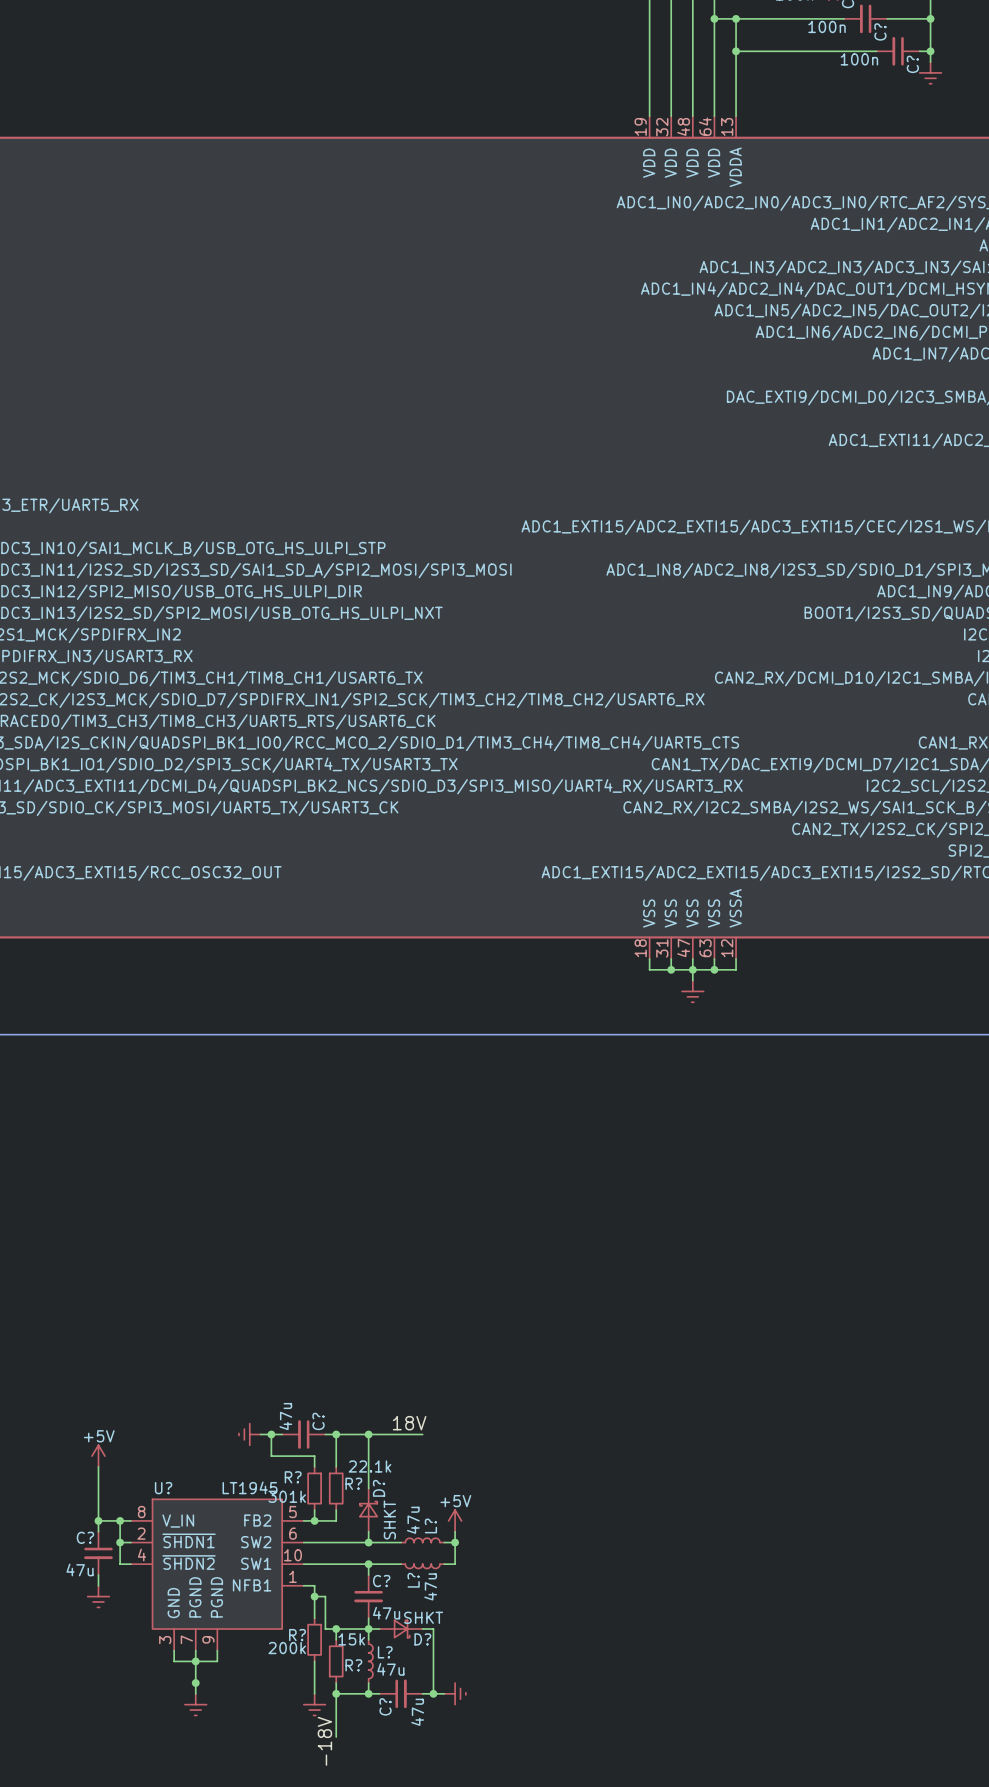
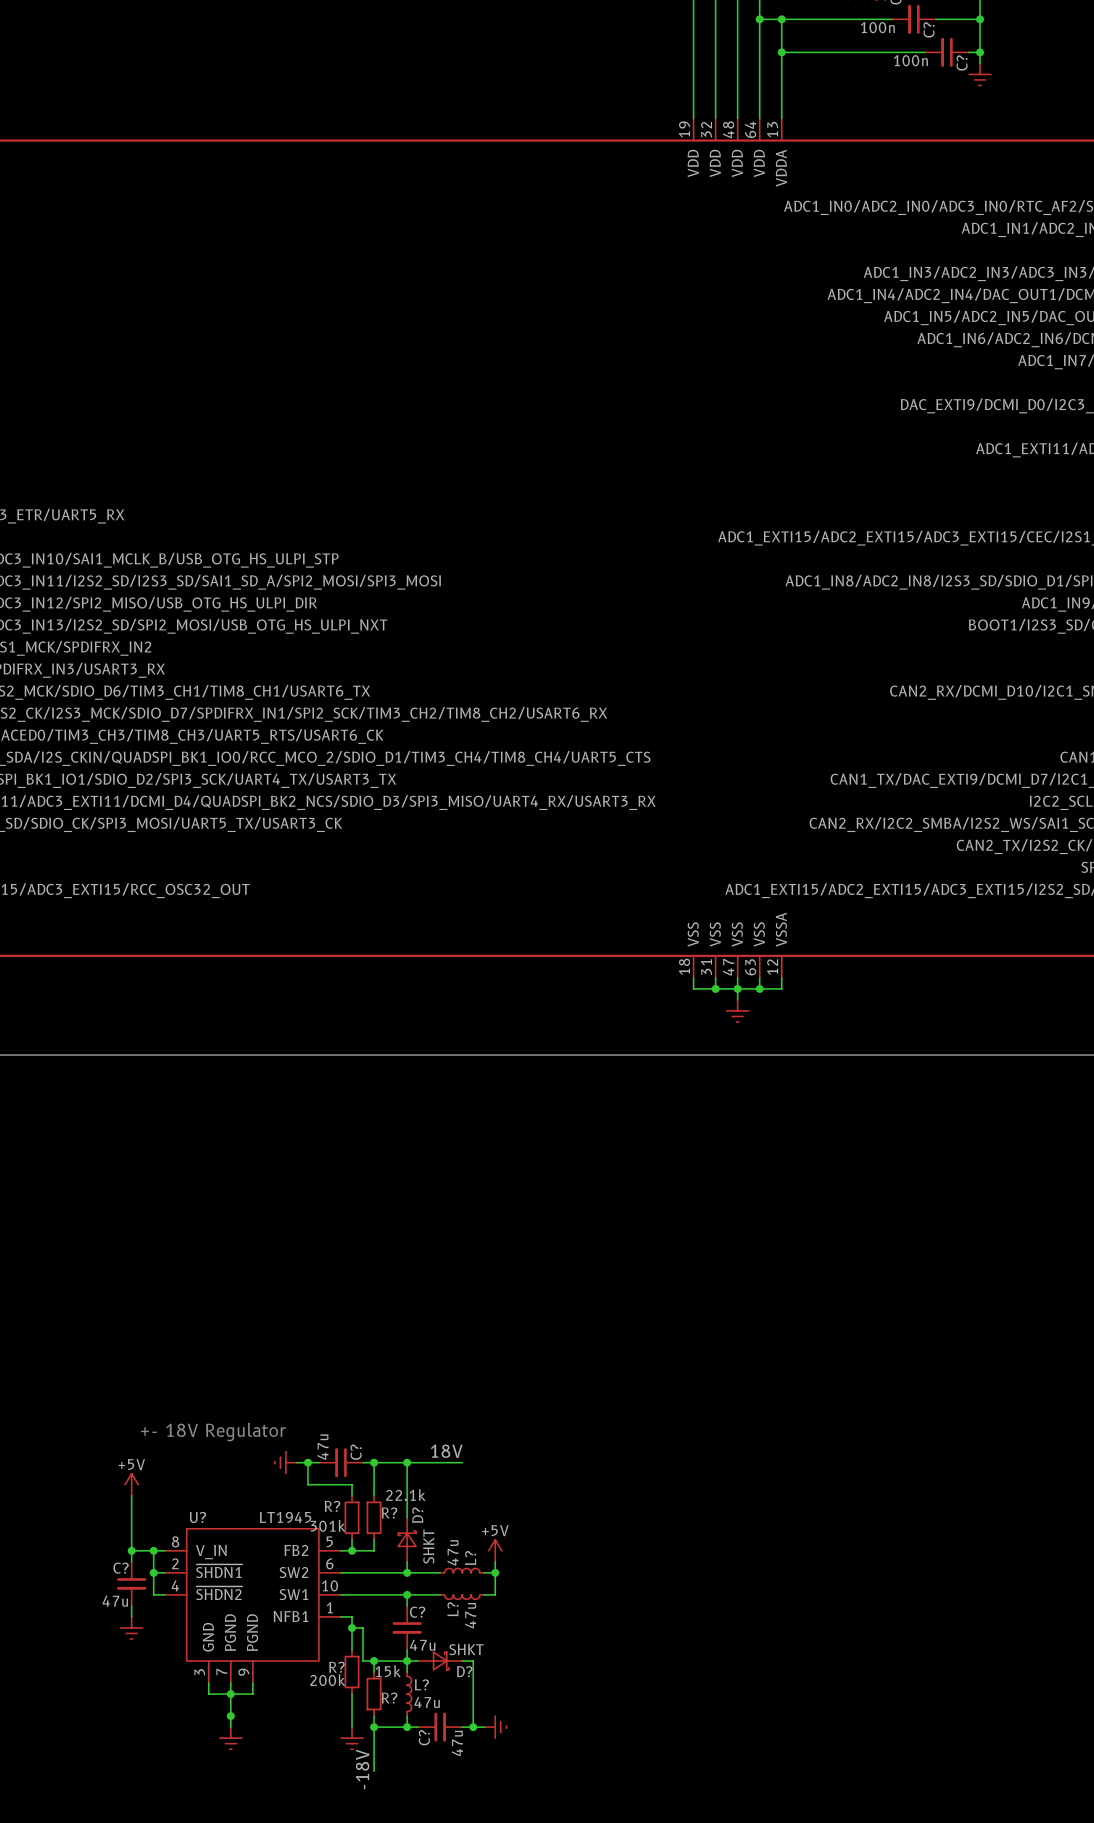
text: none -> +- 18V Regulator (213, 1432)

